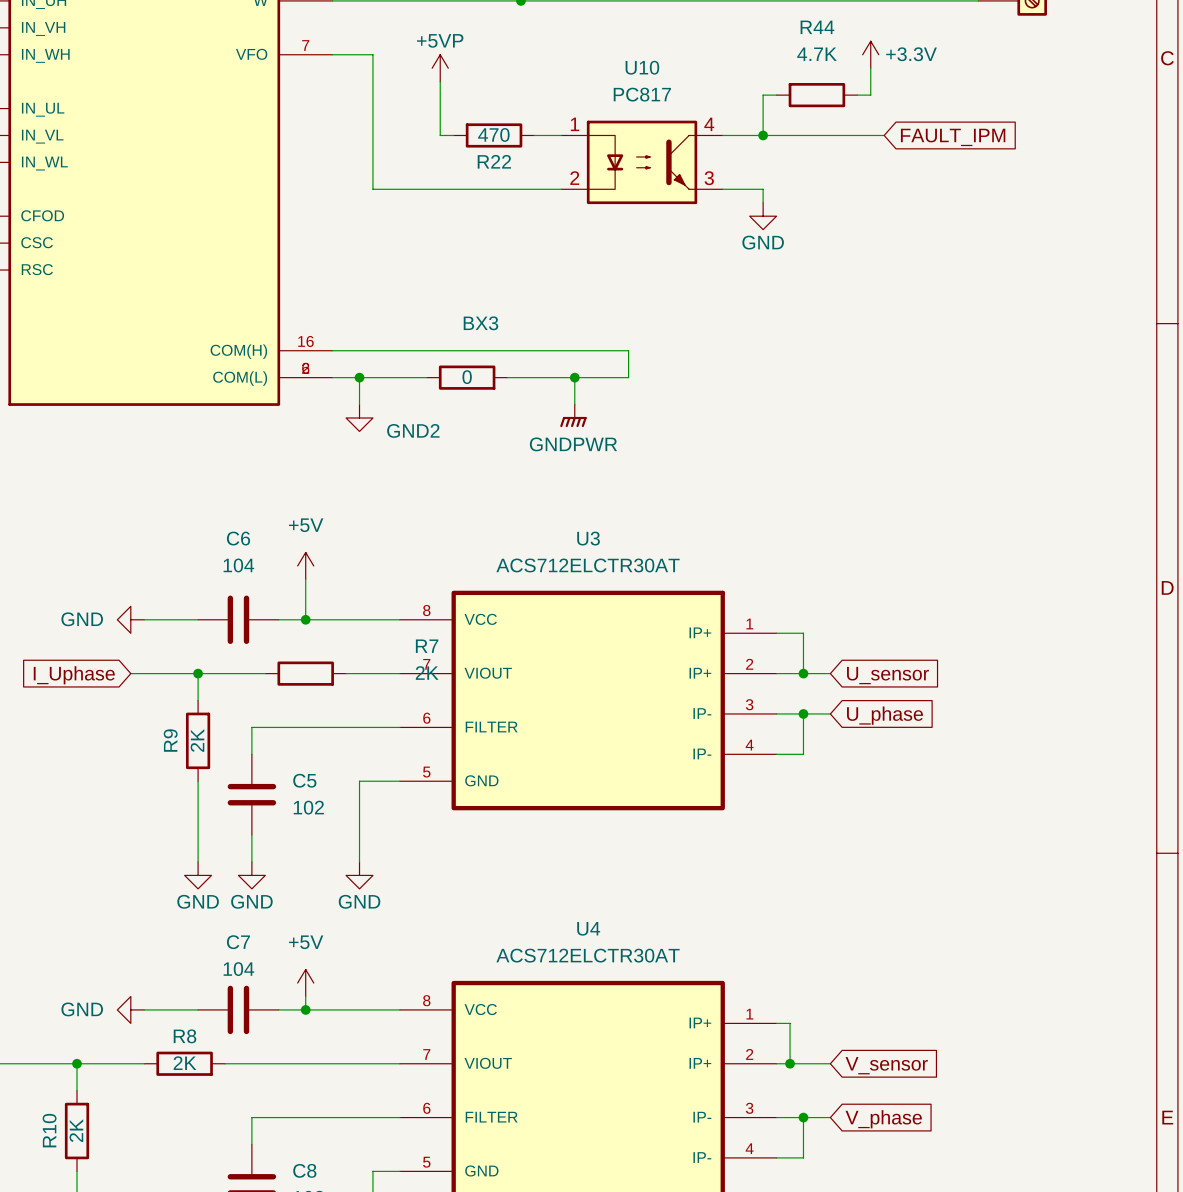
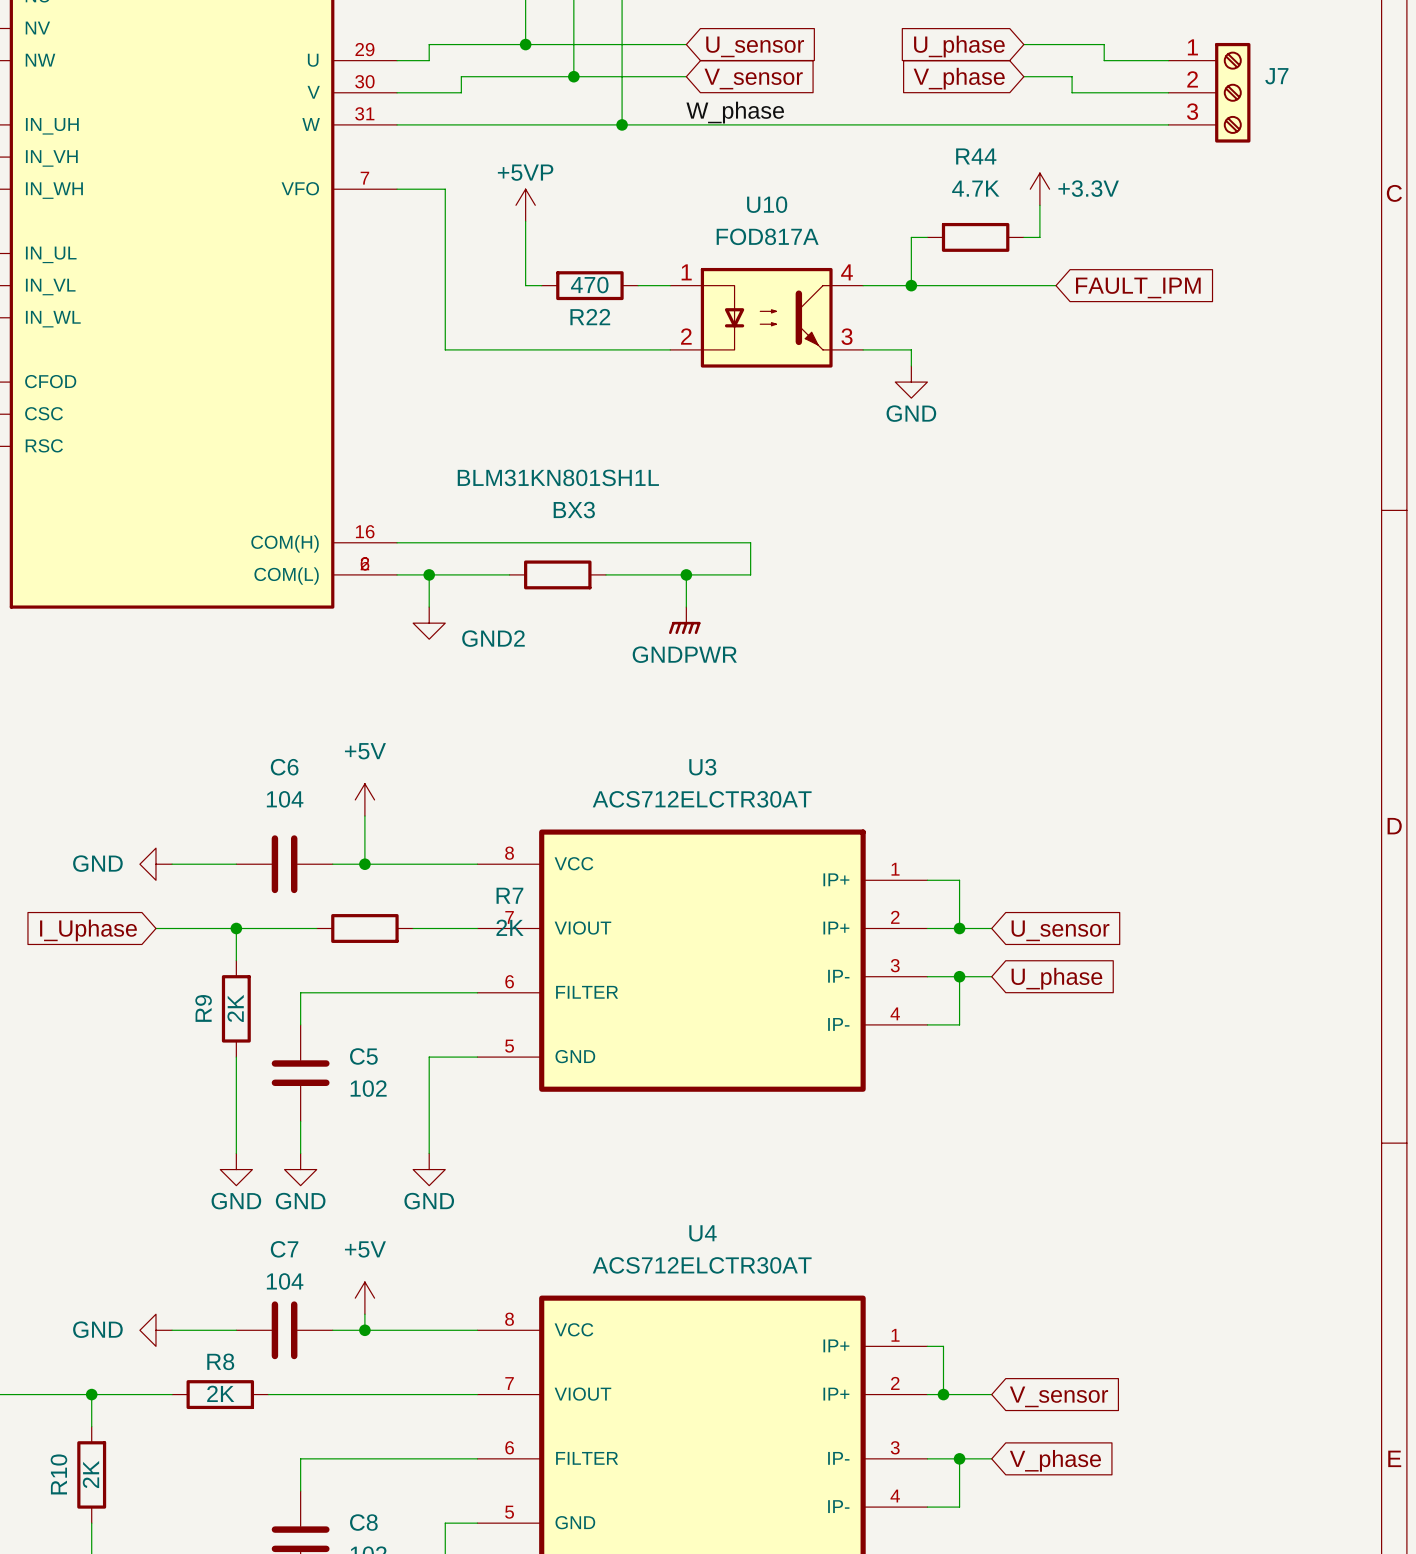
U10 value: PC817 (642, 94) -> FOD817A (767, 236)
BX3 value: 0 (467, 377) -> BLM31KN801SH1L (558, 477)

